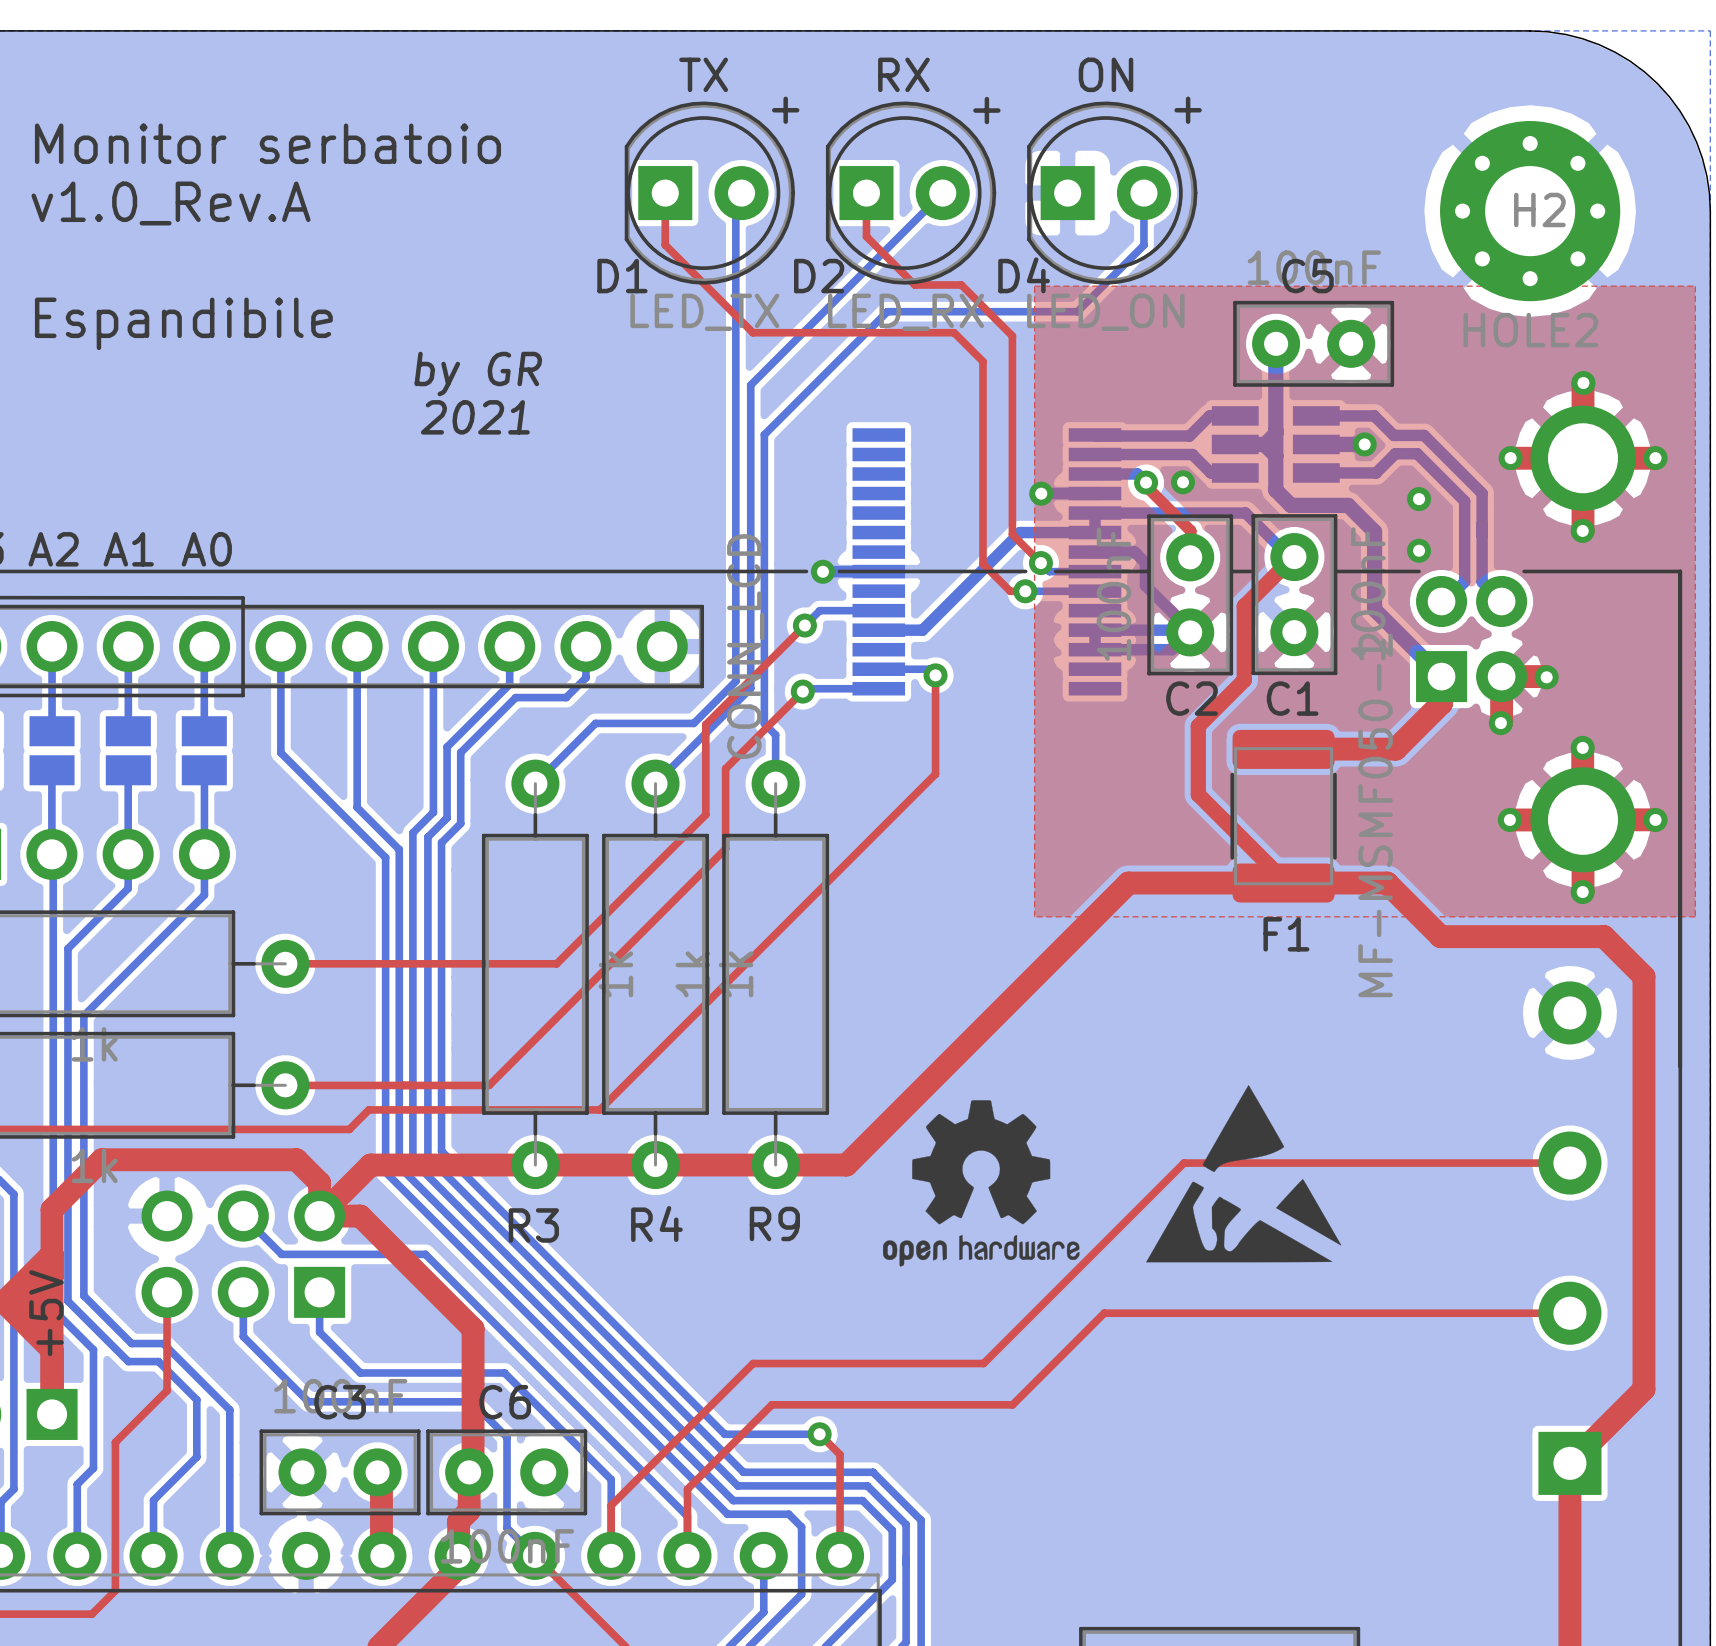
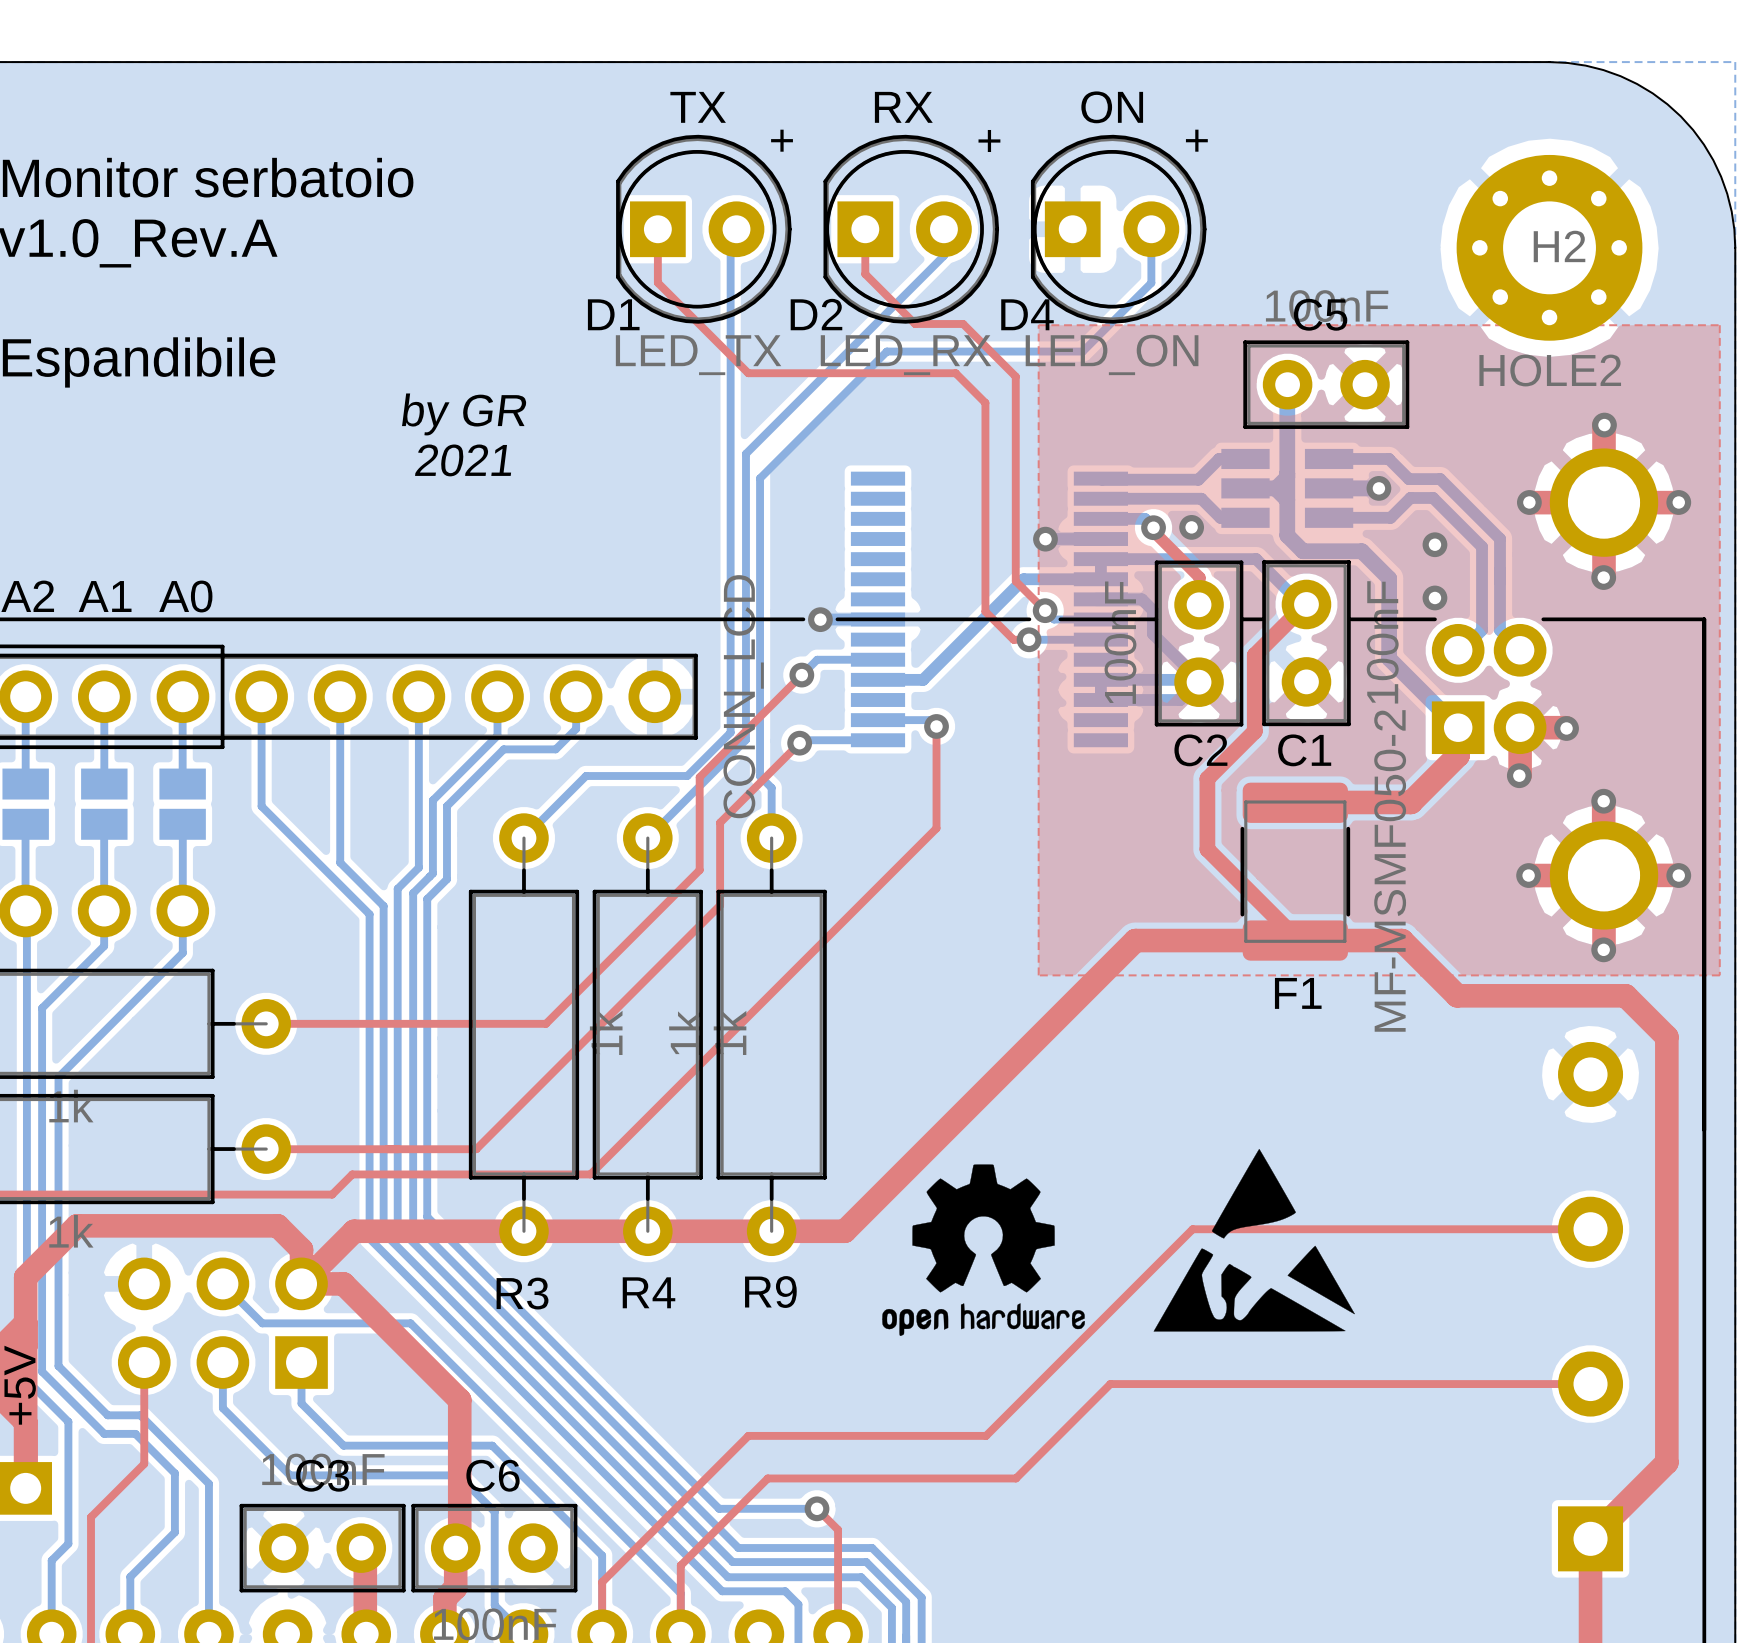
bottom track: (942, 193) (750, 385) (750, 410) -> (943, 229) (943, 255) (745, 453)

